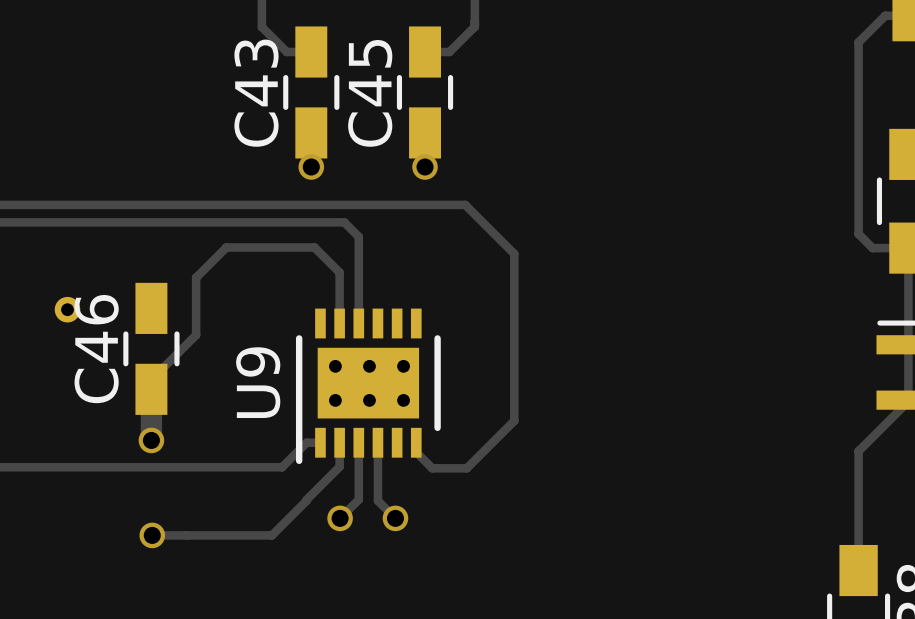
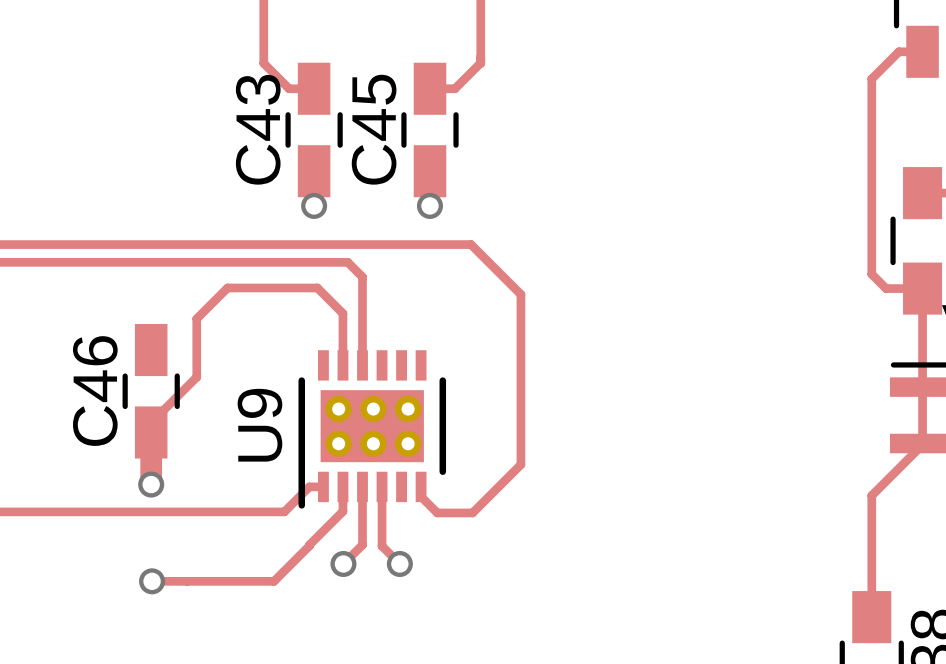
part: (67, 309) -> none

